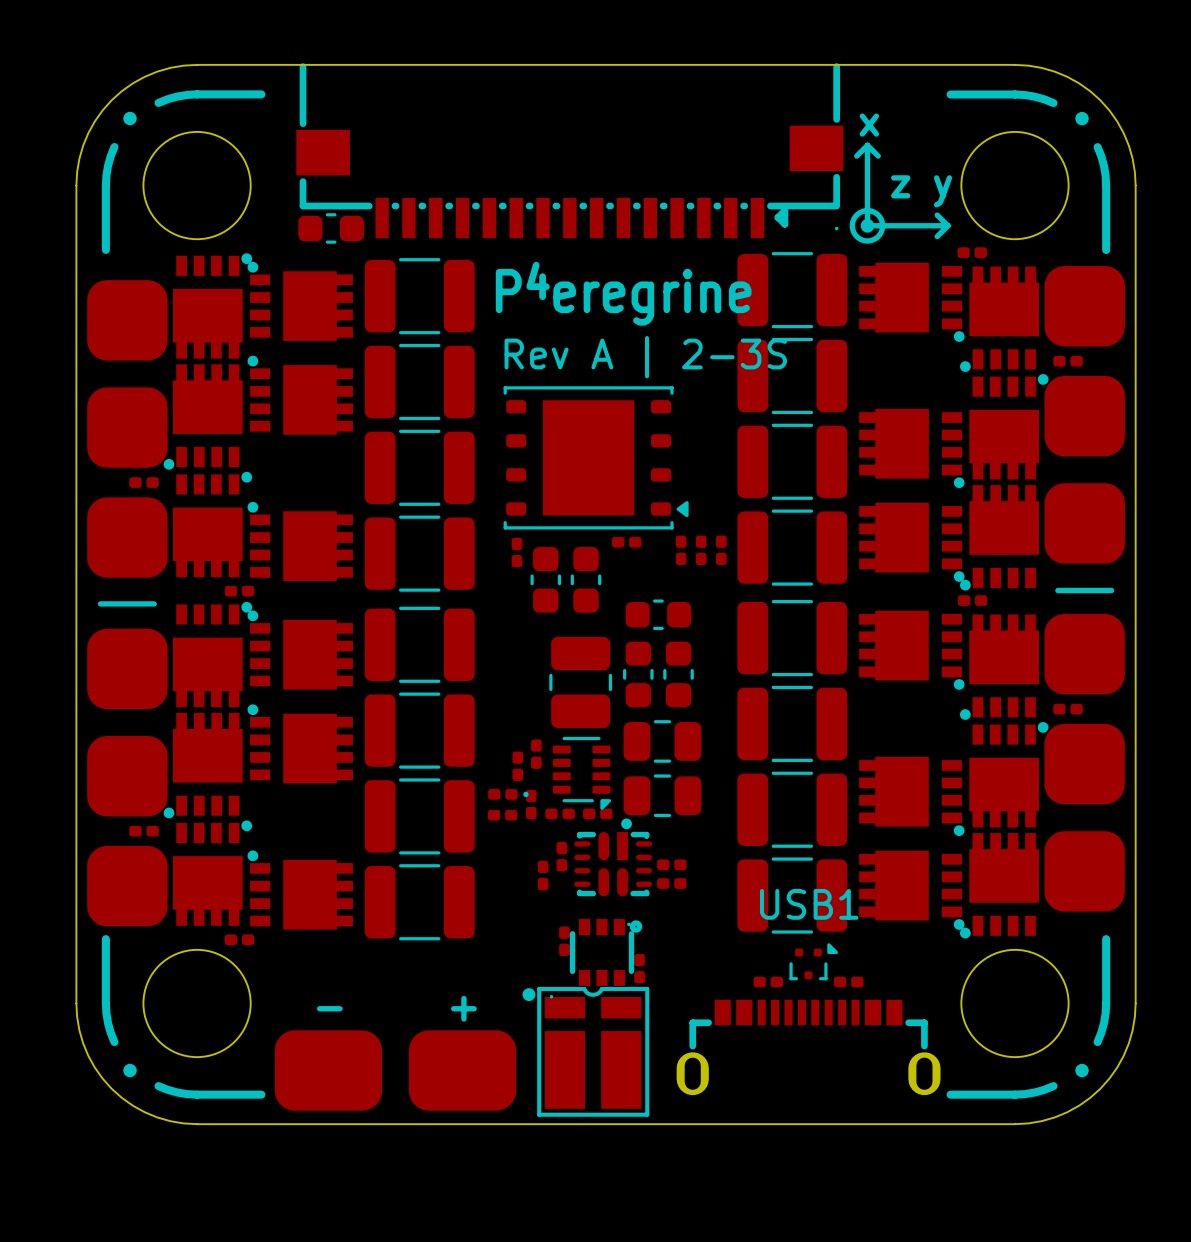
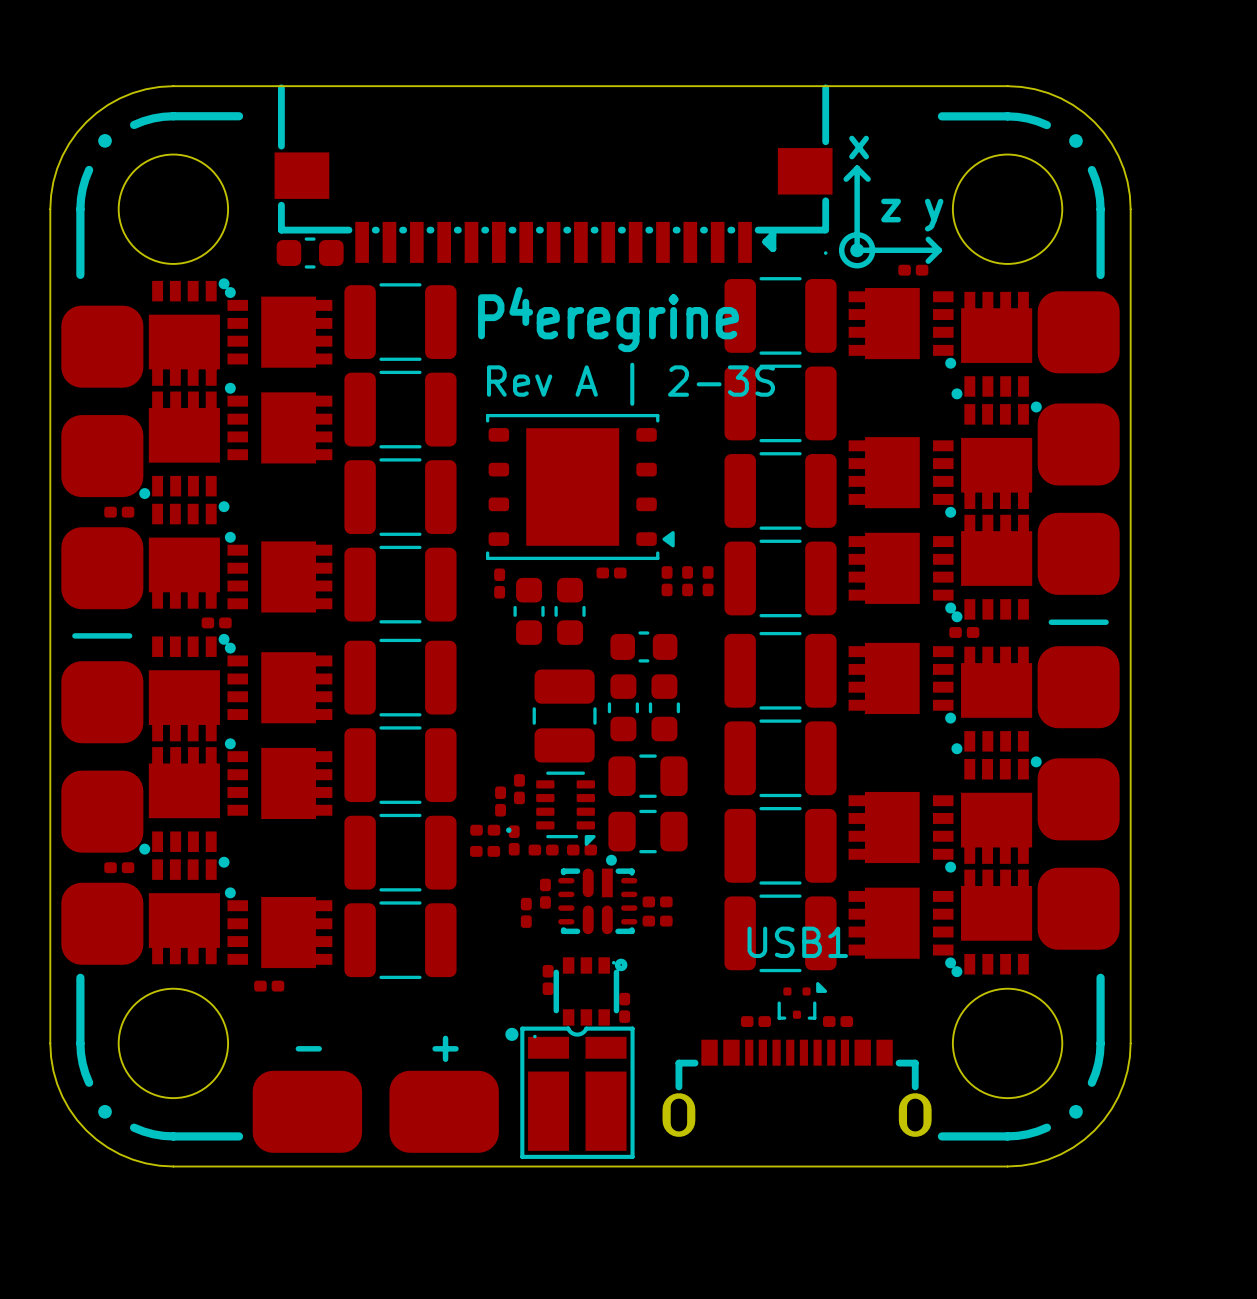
part position: (972, 252) -> (913, 270)
part: (1068, 361) -> none
part: (1068, 709) -> none
part position: (239, 939) -> (269, 986)

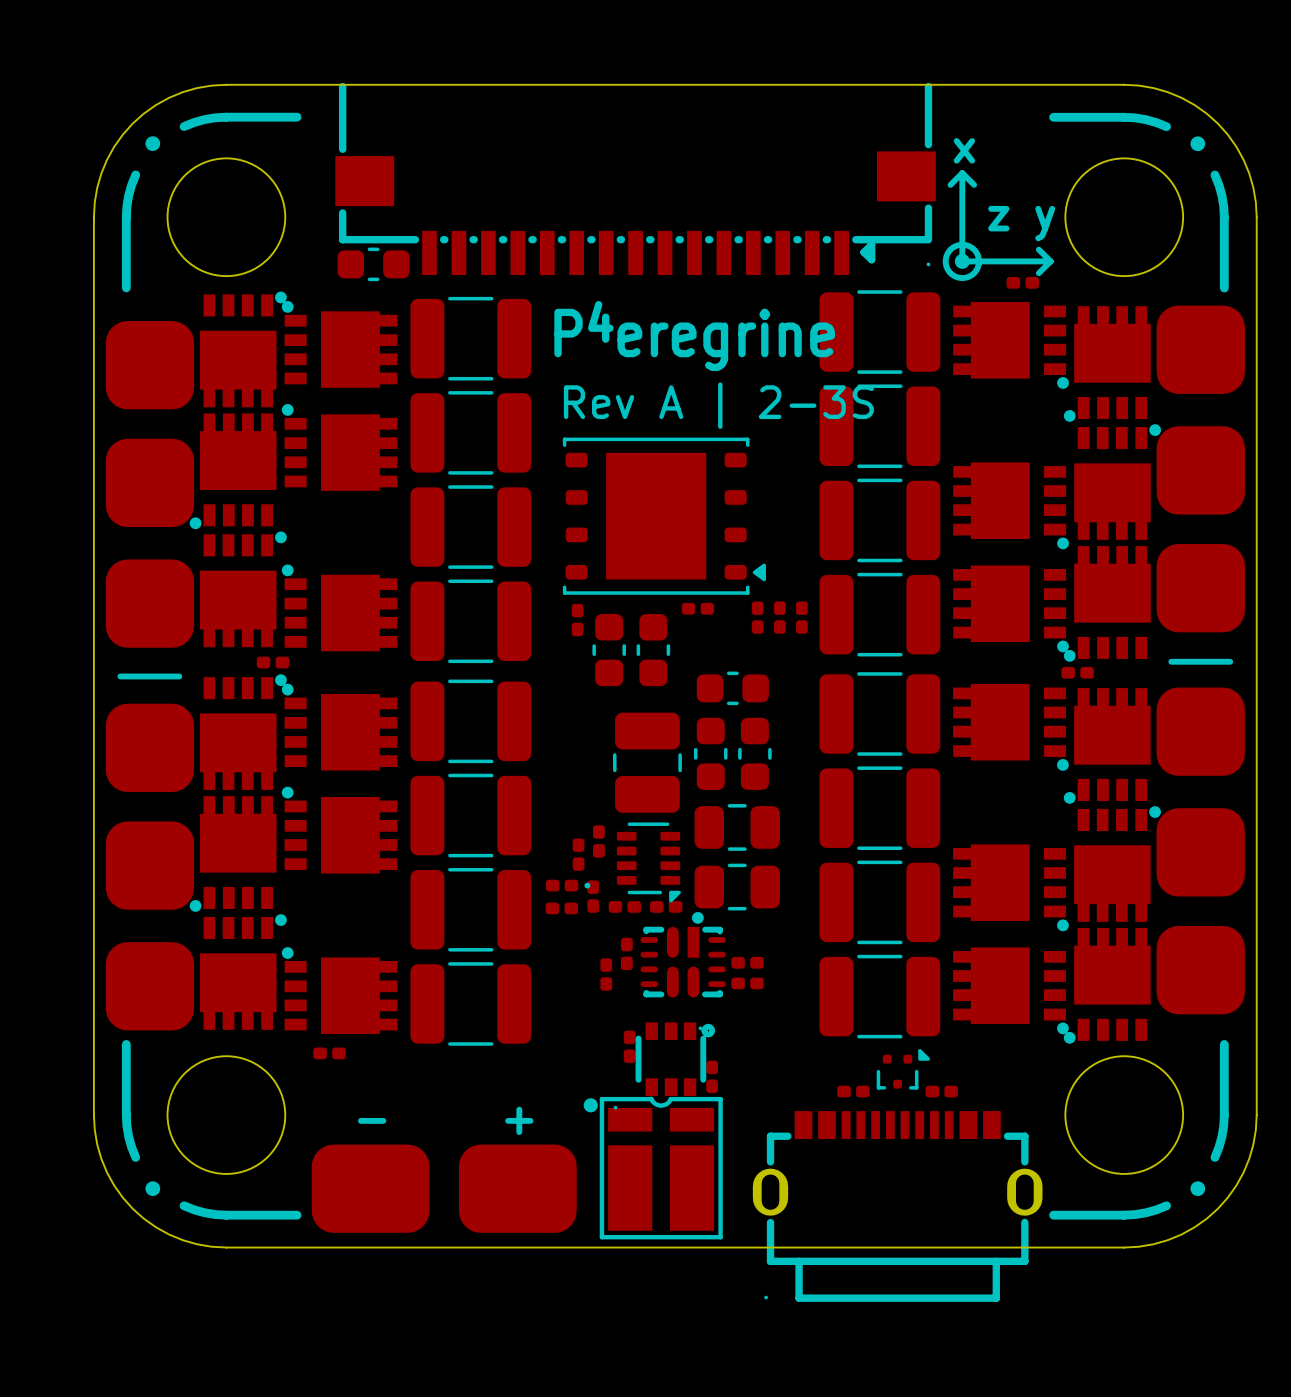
part: (119, 512) -> none
part: (119, 867) -> none
USB1: (797, 1088) -> none
part: none -> (897, 1206)

